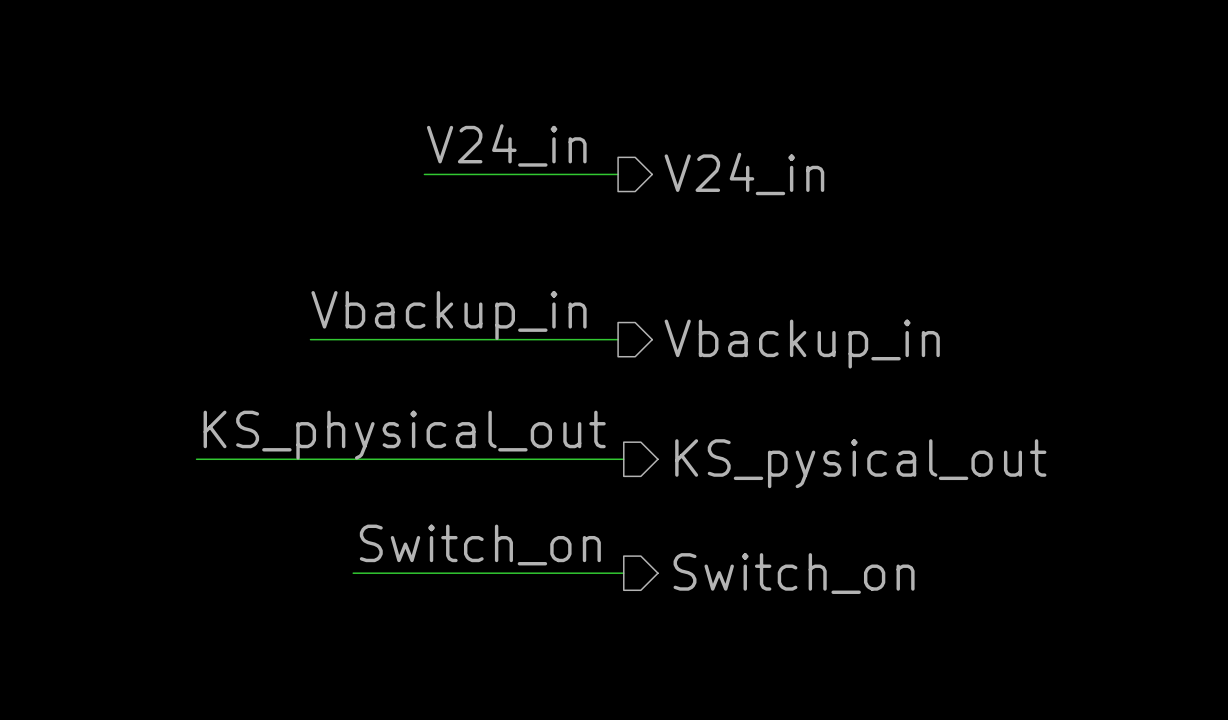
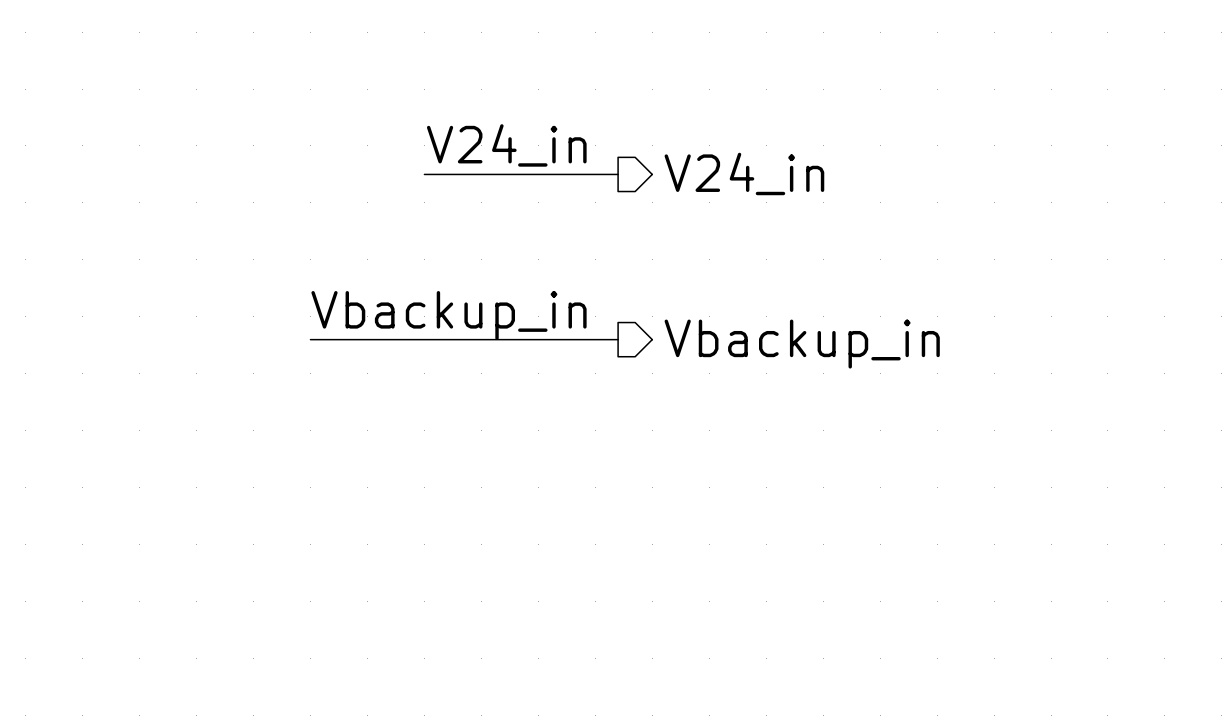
label: KS_physical_out (404, 435) -> none
wire: (196, 459) (623, 459) -> none
hierarchical label: KS_pysical_out (860, 463) -> none
label: Switch_on (480, 545) -> none
wire: (353, 573) (623, 573) -> none
hierarchical label: Switch_on (794, 573) -> none

